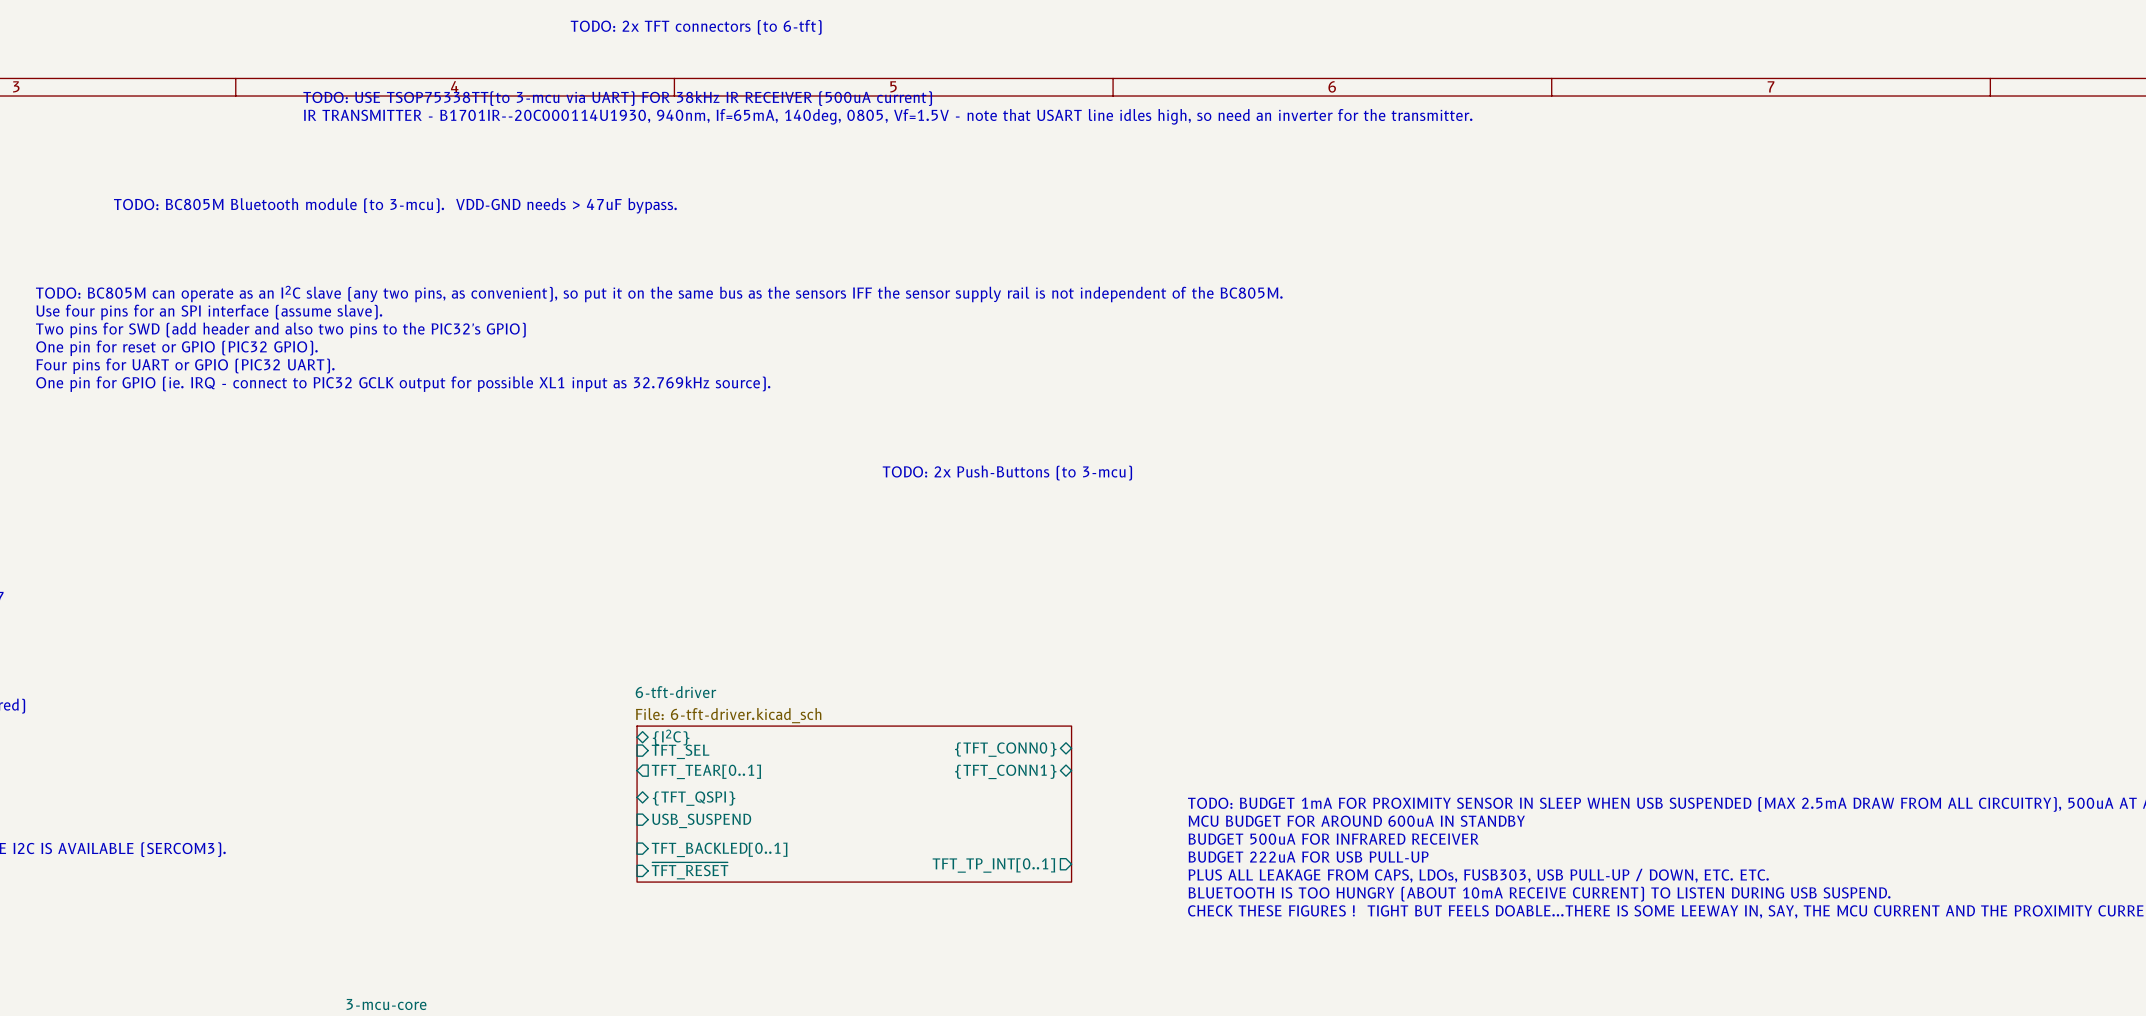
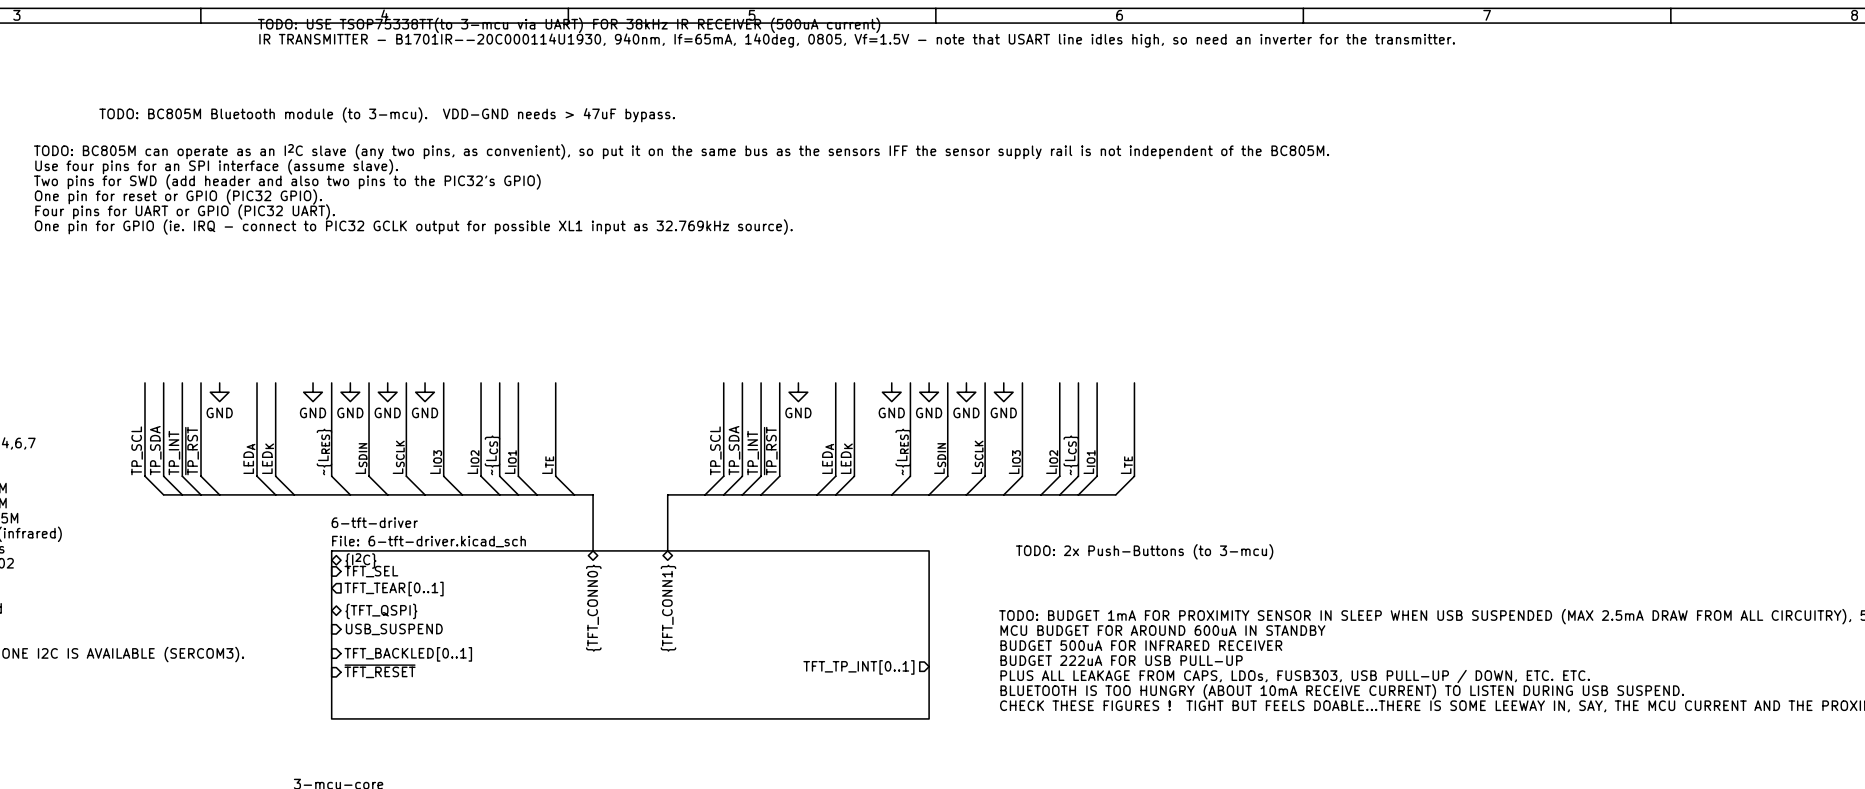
text position: TODO: BC805M can operate as an I2C slave (any two pins, as convenient), so put it on the same bus as the sensors IFF the sensor supply rail is not independent of the BC805M. (659, 294) -> TODO: BC805M can operate as an I2C slave (any two pins, as convenient), so put it on the same bus as the sensors IFF the sensor supply rail is not independent of the BC805M. (681, 151)
text position: Use four pins for an SPI interface (assume slave). (209, 312) -> Use four pins for an SPI interface (assume slave). (216, 166)
text position: Two pins for SWD (add header and also two pins to the PIC32's GPIO) (280, 330) -> Two pins for SWD (add header and also two pins to the PIC32's GPIO) (287, 181)
text position: One pin for reset or GPIO (PIC32 GPIO). (177, 348) -> One pin for reset or GPIO (PIC32 GPIO). (178, 196)
text position: Four pins for UART or GPIO (PIC32 UART). (185, 366) -> Four pins for UART or GPIO (PIC32 UART). (185, 211)
text position: One pin for GPIO (ie. IRQ - connect to PIC32 GCLK output for possible XL1 input as 32.769kHz source). (403, 384) -> One pin for GPIO (ie. IRQ - connect to PIC32 GCLK output for possible XL1 input as 32.769kHz source). (413, 227)
text: TODO: 2x Push-Buttons (to 3-mcu) (1007, 473) -> none
wire: none -> (144, 382) (144, 476) (163, 494)
wire: none -> (163, 382) (163, 476) (182, 494)
wire: none -> (182, 382) (182, 476) (201, 494)
wire: none -> (201, 382) (201, 476) (219, 494)
wire: none -> (257, 382) (257, 476) (275, 494)
wire: none -> (275, 382) (275, 476) (294, 494)
wire: none -> (331, 382) (331, 476) (350, 494)
wire: none -> (369, 382) (369, 476) (387, 494)
wire: none -> (406, 382) (406, 476) (425, 494)
wire: none -> (443, 382) (443, 476) (462, 494)
wire: none -> (481, 382) (481, 476) (499, 494)
wire: none -> (499, 382) (499, 476) (518, 494)
wire: none -> (518, 382) (518, 476) (537, 494)
wire: none -> (555, 382) (555, 476) (574, 494)
wire: none -> (723, 382) (723, 476) (705, 494)
wire: none -> (742, 382) (742, 476) (723, 494)
wire: none -> (761, 382) (761, 476) (742, 494)
wire: none -> (779, 382) (779, 476) (761, 494)
wire: none -> (835, 382) (835, 476) (817, 494)
wire: none -> (854, 382) (854, 476) (835, 494)
wire: none -> (910, 382) (910, 476) (891, 494)
wire: none -> (947, 382) (947, 476) (929, 494)
wire: none -> (985, 382) (985, 476) (966, 494)
wire: none -> (1022, 382) (1022, 476) (1003, 494)
wire: none -> (1059, 382) (1059, 476) (1041, 494)
wire: none -> (1078, 382) (1078, 476) (1059, 494)
wire: none -> (1097, 382) (1097, 476) (1078, 494)
wire: none -> (1134, 382) (1134, 476) (1115, 494)
power symbol: none -> GND (219, 392)
power symbol: none -> GND (313, 392)
power symbol: none -> GND (350, 392)
power symbol: none -> GND (387, 392)
power symbol: none -> GND (425, 392)
power symbol: none -> GND (798, 392)
power symbol: none -> GND (891, 392)
power symbol: none -> GND (929, 392)
power symbol: none -> GND (966, 392)
power symbol: none -> GND (1003, 392)
label: none -> ~{LRES} (324, 451)
label: none -> ~{LRES} (903, 451)
label: none -> TP_SDA (155, 450)
label: none -> ~{TP_RST} (192, 451)
label: none -> TP_SDA (734, 450)
label: none -> ~{TP_RST} (770, 451)
label: none -> TP_SCL (137, 450)
label: none -> ~{LCS} (492, 455)
label: none -> TP_SCL (715, 450)
label: none -> ~{LCS} (1071, 455)
label: none -> TP_INT (174, 453)
label: none -> TP_INT (753, 453)
label: none -> LSCLK (398, 457)
label: none -> LSCLK (977, 457)
label: none -> LEDA (249, 458)
label: none -> LEDK (268, 458)
label: none -> LSDIN (361, 458)
label: none -> LEDA (828, 458)
label: none -> LEDK (846, 458)
label: none -> LSDIN (940, 458)
label: none -> LIO3 (436, 462)
label: none -> LIO2 (473, 462)
label: none -> LIO1 (510, 462)
label: none -> LIO3 (1014, 462)
label: none -> LIO2 (1052, 462)
label: none -> LIO1 (1089, 462)
label: none -> LTE (548, 465)
label: none -> LTE (1126, 465)
bus: none -> (163, 494) (593, 494) (593, 550)
bus: none -> (1115, 494) (667, 494) (667, 550)
sheet 6-tft-driver name position: 6-tft-driver (675, 692) -> 6-tft-driver (374, 522)
sheet 6-tft-driver value position: File: 6-tft-driver.kicad_sch (728, 715) -> File: 6-tft-driver.kicad_sch (429, 541)
sheet 6-tft-driver shape: [636, 725, 1073, 883] -> [331, 550, 930, 720]
text: none -> TODO: 2x Push-Buttons (to 3-mcu) (1144, 551)
sheet pin: none -> {I2C} (360, 560)
sheet pin: {I2C} (671, 737) -> none
sheet pin: {TFT_CONN0} (1005, 749) -> none
sheet pin: none -> TFT_SEL (371, 571)
sheet pin: TFT_SEL (680, 751) -> none
sheet pin: none -> TFT_TEAR[0..1] (394, 589)
sheet pin: TFT_TEAR[0..1] (706, 771) -> none
sheet pin: {TFT_CONN1} (1005, 771) -> none
sheet pin: none -> {TFT_CONN0} (593, 608)
sheet pin: none -> {TFT_CONN1} (668, 608)
sheet pin: none -> {TFT_QSPI} (381, 611)
sheet pin: {TFT_QSPI} (694, 798) -> none
sheet pin: none -> USB_SUSPEND (394, 629)
sheet pin: USB_SUSPEND (701, 820) -> none
sheet pin: none -> TFT_BACKLED[0..1] (408, 654)
sheet pin: TFT_BACKLED[0..1] (719, 849) -> none
sheet pin position: TFT_TP_INT[0..1] (993, 865) -> TFT_TP_INT[0..1] (858, 667)
sheet pin: none -> ~{TFT_RESET} (380, 671)
sheet pin: ~{TFT_RESET} (690, 870) -> none

